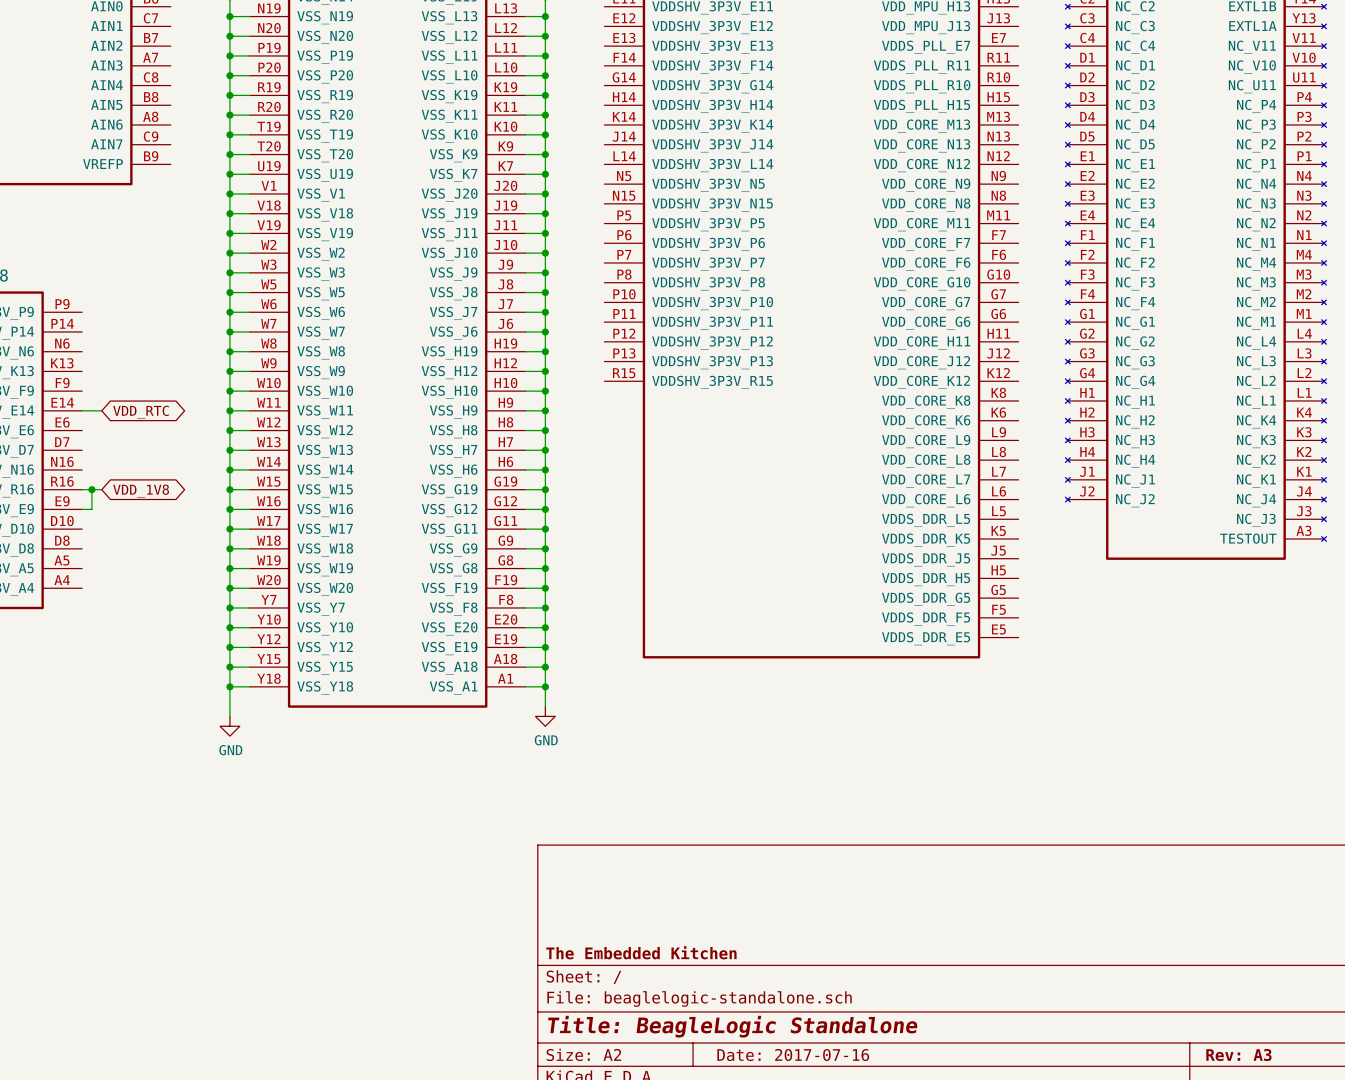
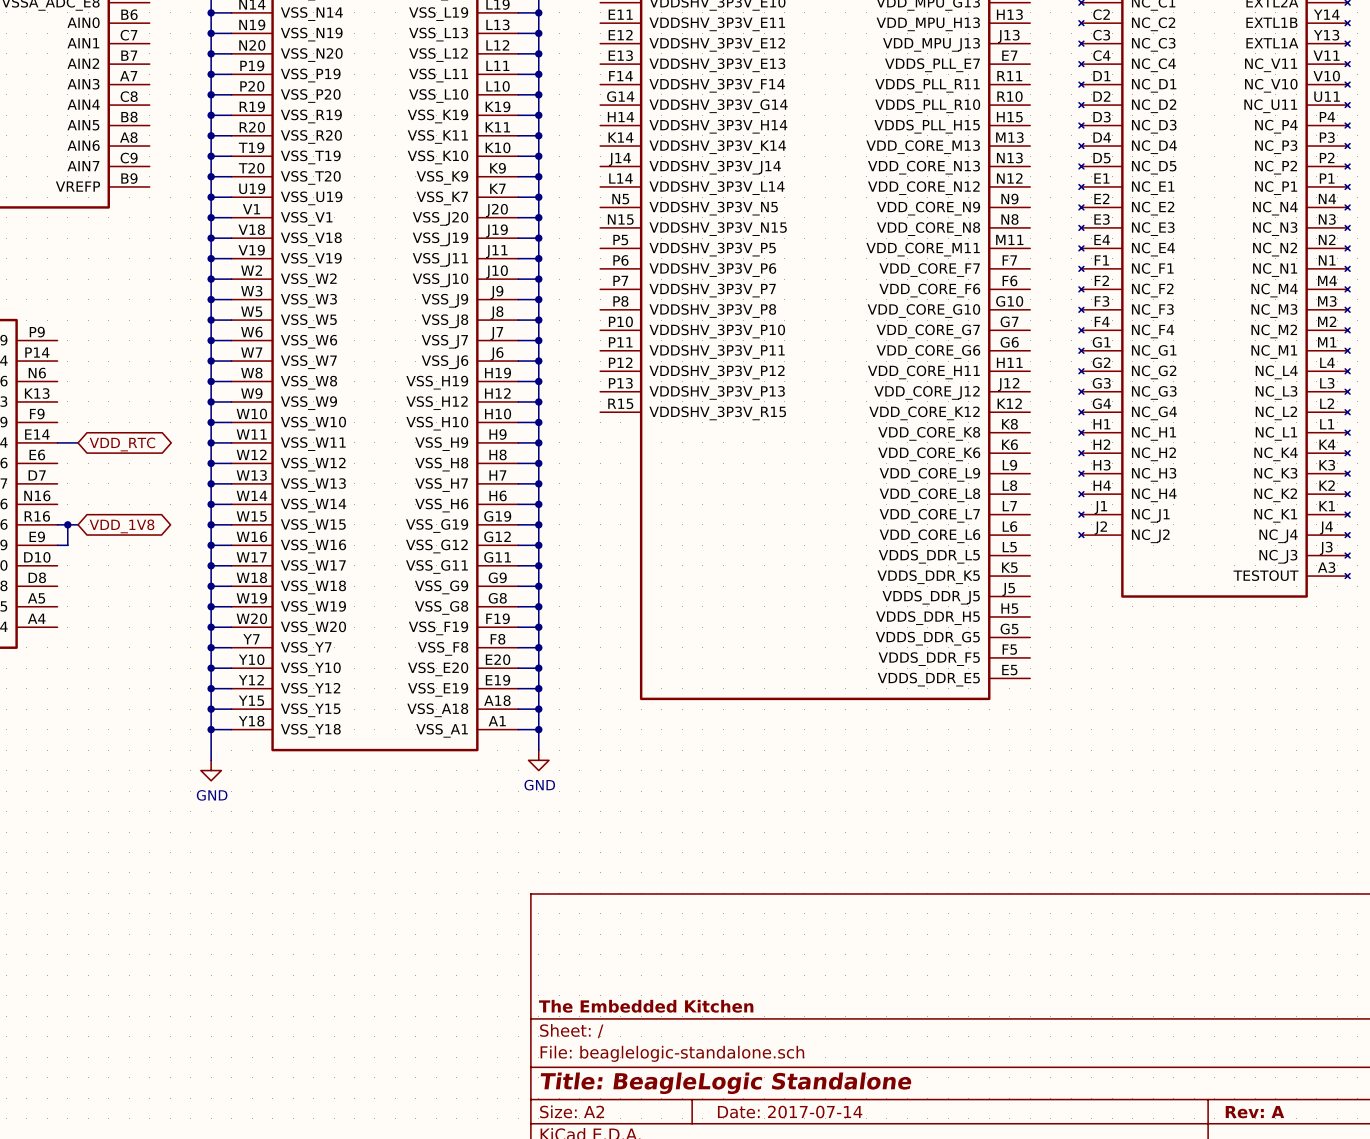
title block: Date: 2017-07-16 (793, 1055) -> Date: 2017-07-14 (790, 1112)
title block: Rev: A3 (1238, 1055) -> Rev: A (1254, 1112)

